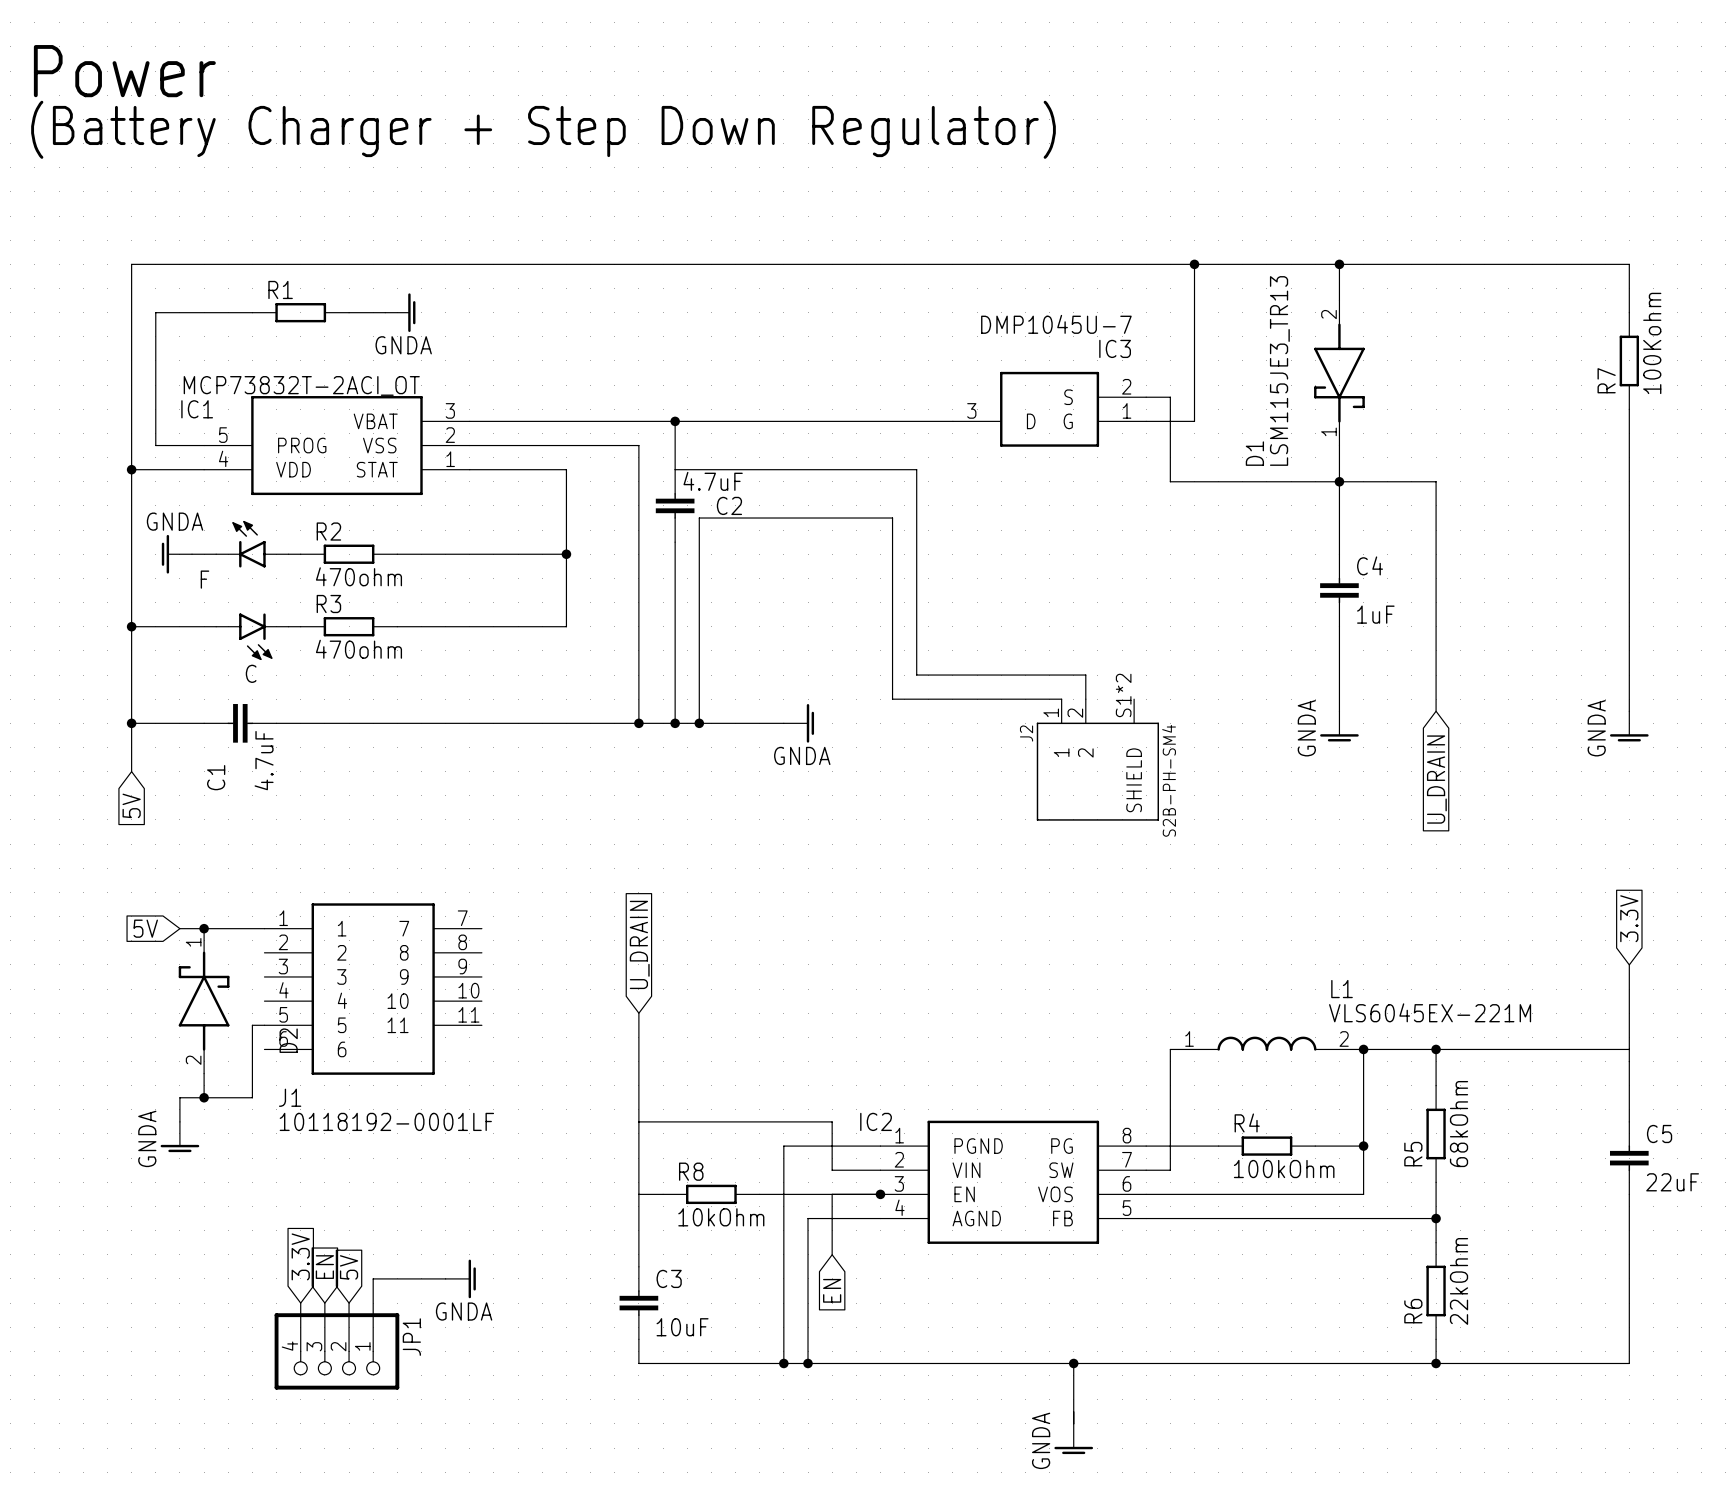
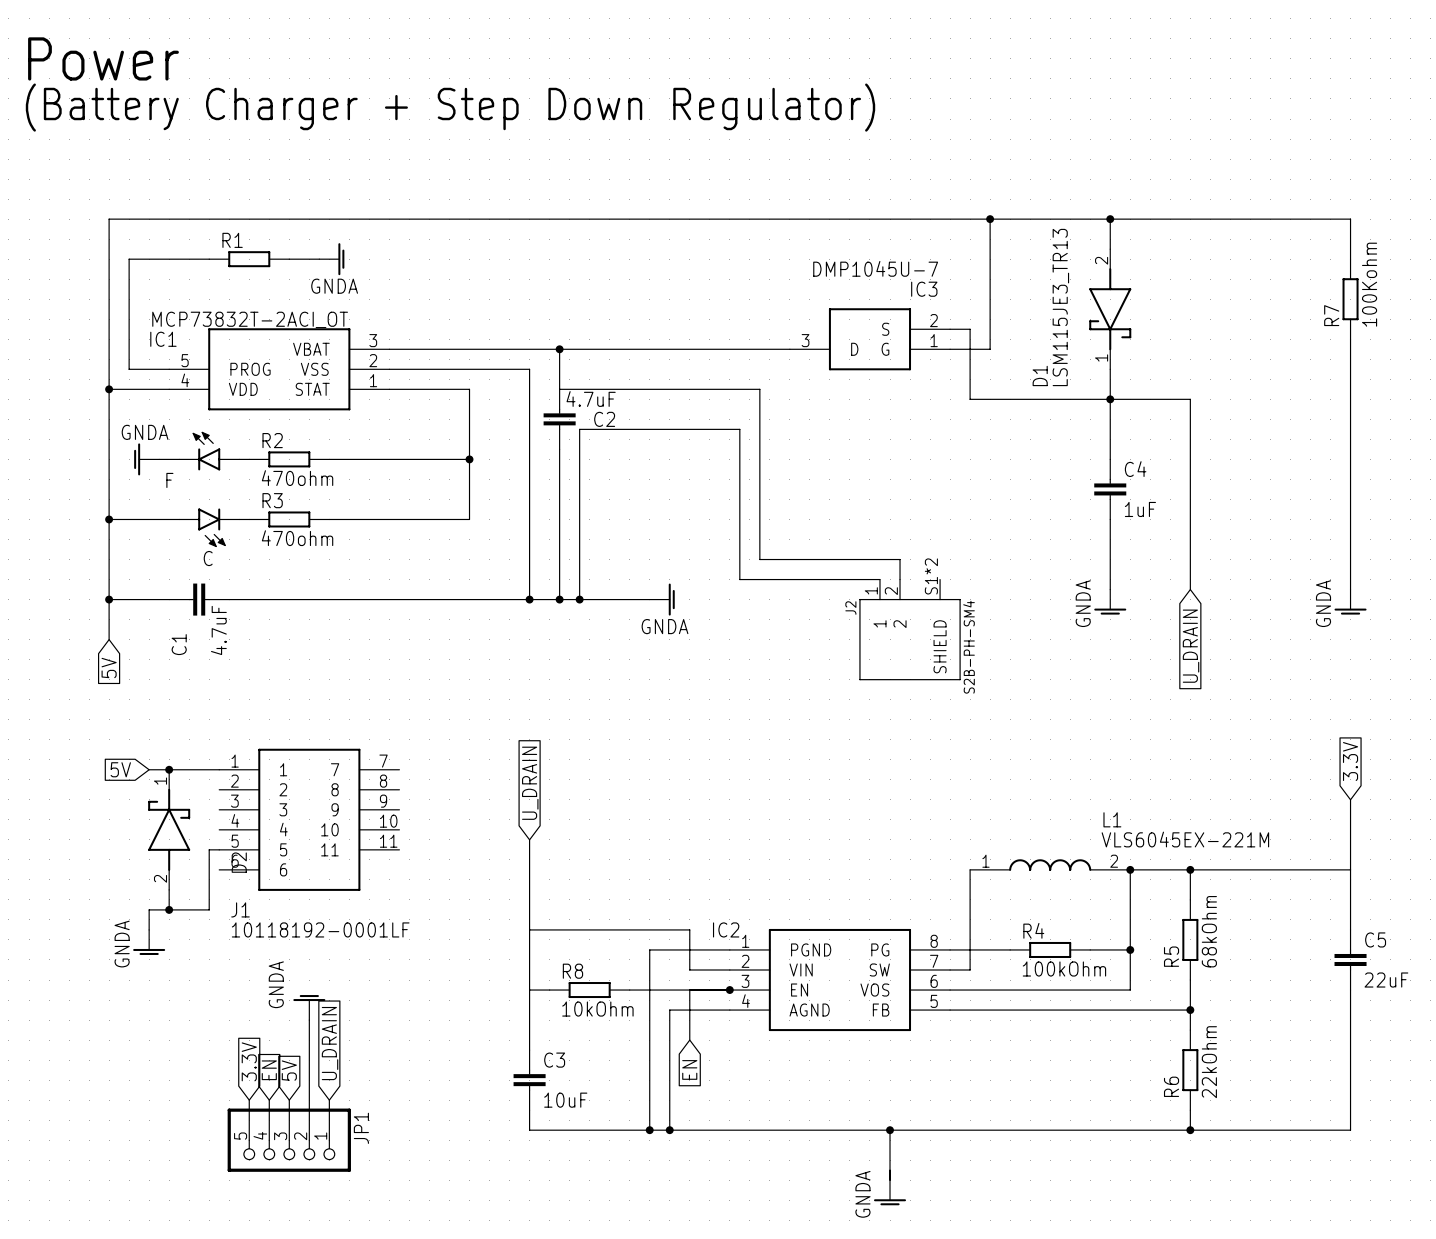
global label position: 3.3V (300, 1256) -> 3.3V (249, 1061)
global label: none -> U_DRAIN (330, 1043)
global label position: EN (324, 1267) -> EN (269, 1070)
global label position: 5V (349, 1267) -> 5V (289, 1070)
wire: (373, 1278) (445, 1278) -> (309, 1060) (309, 1020)
power symbol position: GNDA (460, 1278) -> GNDA (309, 1007)
power symbol rotation: 0° (472, 1278) -> 90° counterclockwise (309, 998)
wire: (300, 1303) (300, 1327) -> (249, 1120) (249, 1140)
wire: (324, 1303) (324, 1327) -> (269, 1120) (269, 1140)
wire: (349, 1303) (349, 1327) -> (289, 1120) (289, 1140)
power symbol text position: GNDA (464, 1311) -> GNDA (276, 984)
JP1 symbol: [274, 1313, 400, 1390] -> [227, 1108, 351, 1172]
wire: none -> (309, 1120) (309, 1140)

